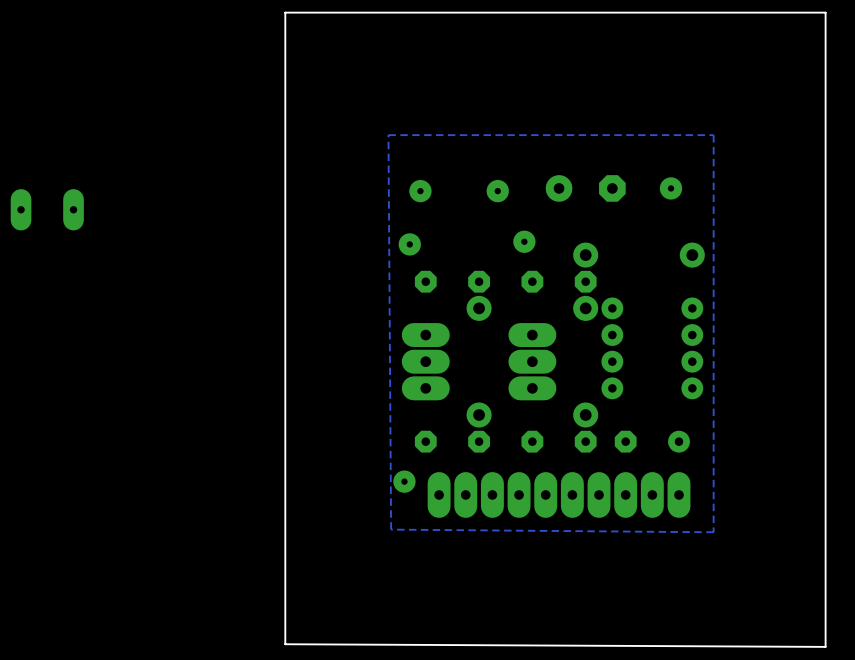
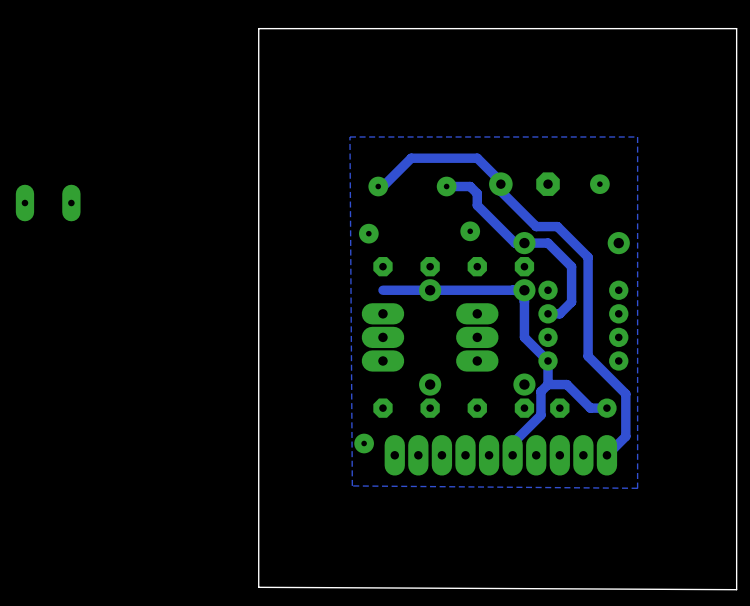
track: none -> (382, 186) (411, 158) (477, 158) (500, 181) (500, 191) (536, 226) (557, 226) (588, 257) (588, 356) (625, 393) (625, 436) (606, 455)
track: none -> (451, 186) (470, 186) (477, 193) (477, 205) (515, 243) (548, 243) (571, 266) (571, 302) (559, 313) (548, 313)
track: none -> (382, 290) (524, 290) (524, 337) (548, 360) (548, 384)
track: none -> (548, 384) (566, 384) (590, 408) (606, 408)
track: none -> (548, 384) (540, 391) (540, 415) (512, 443) (512, 455)

